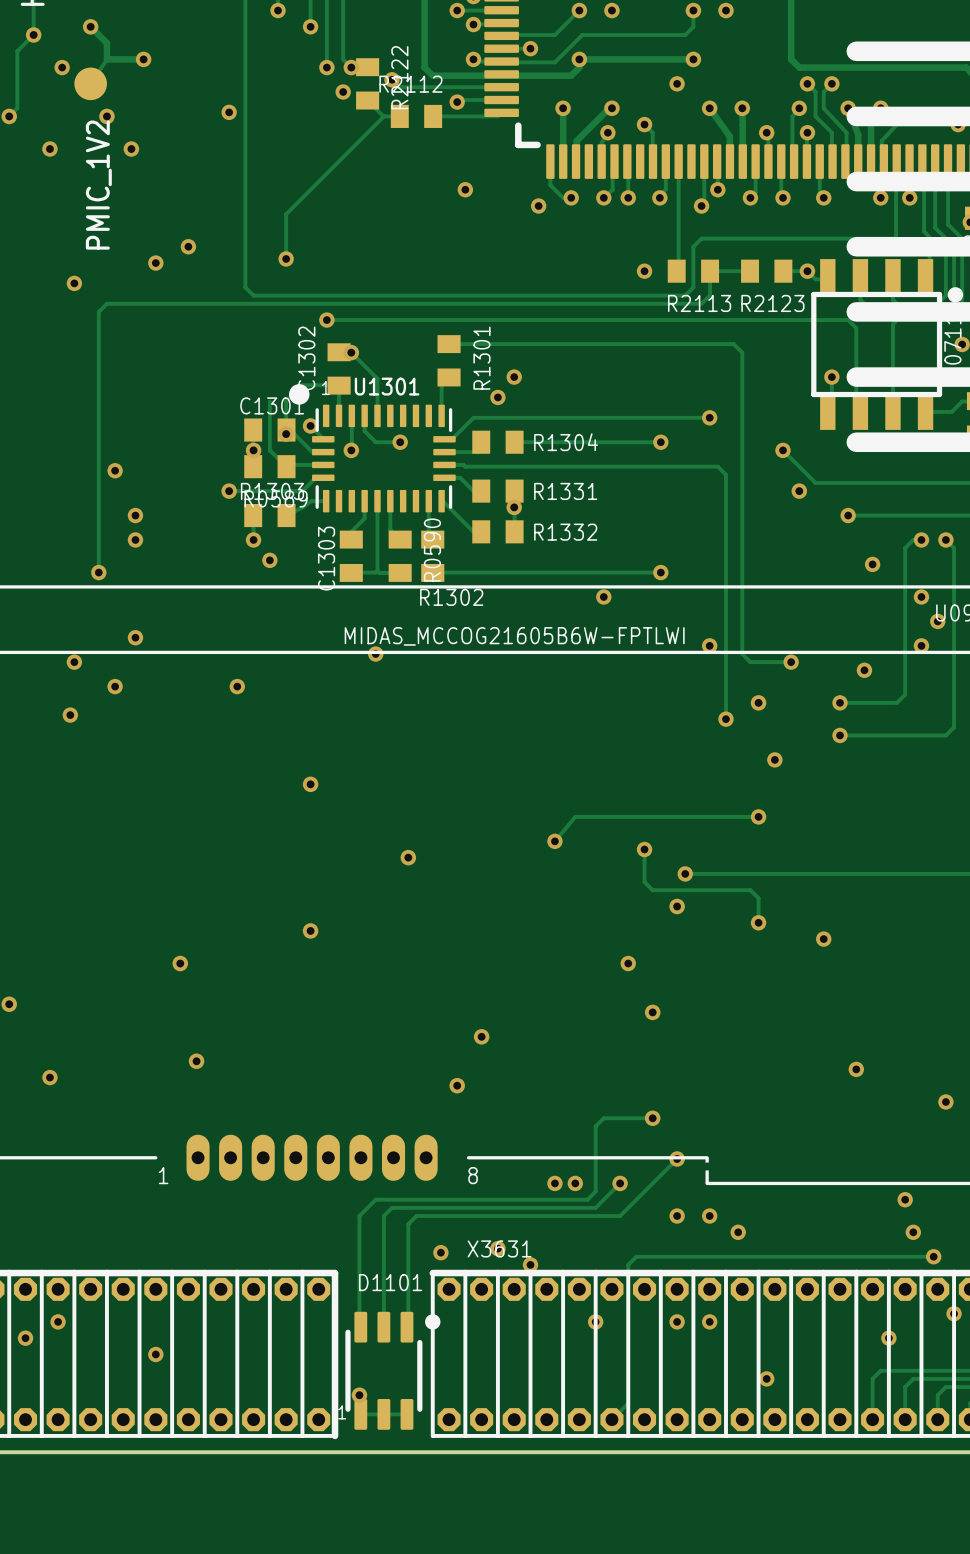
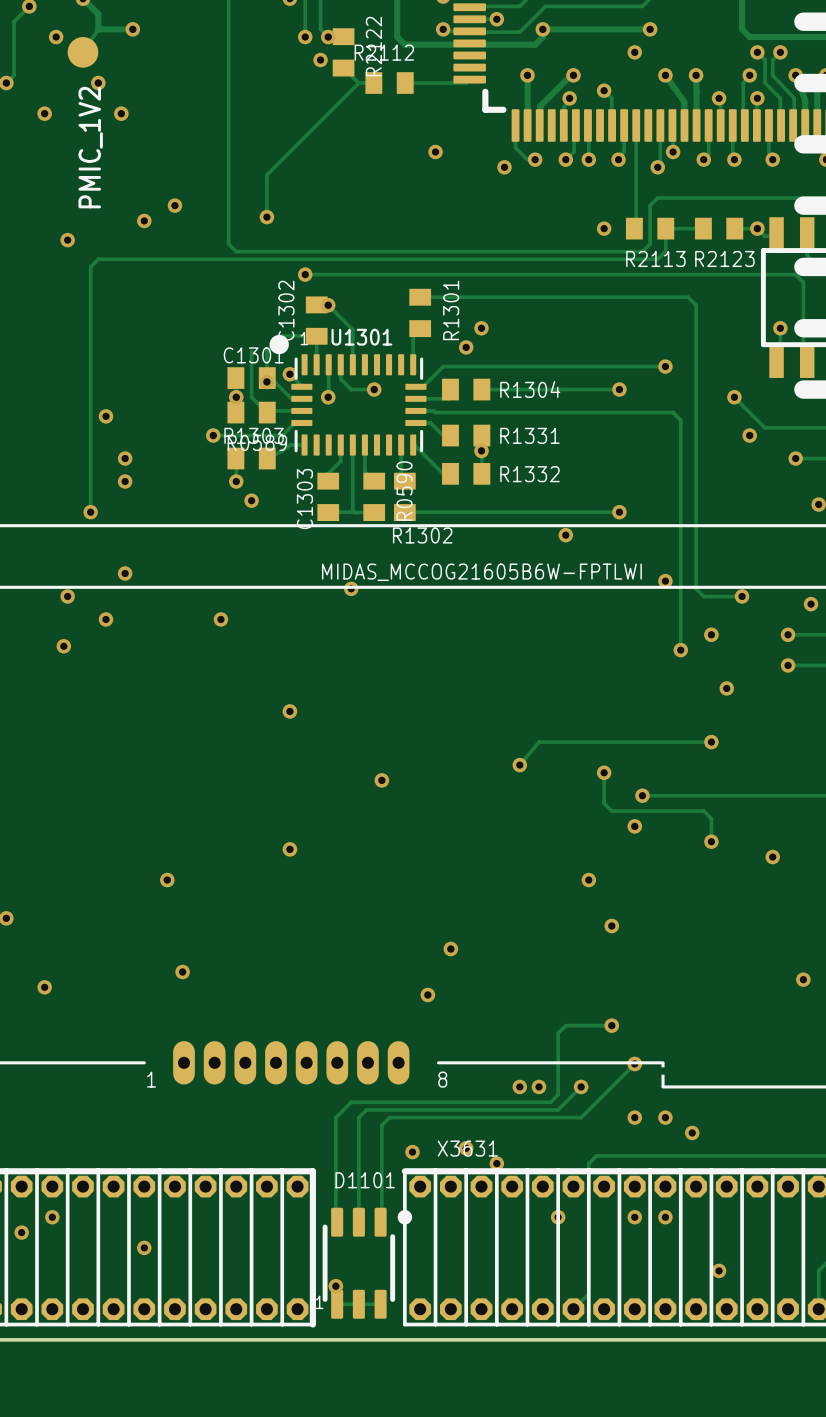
track: (392, 79) (399, 87) (501, 87) -> none
via: (392, 79) -> none
track: (501, 100) (461, 100) (457, 102) -> none
via: (457, 102) -> none
via: (229, 112) -> none

